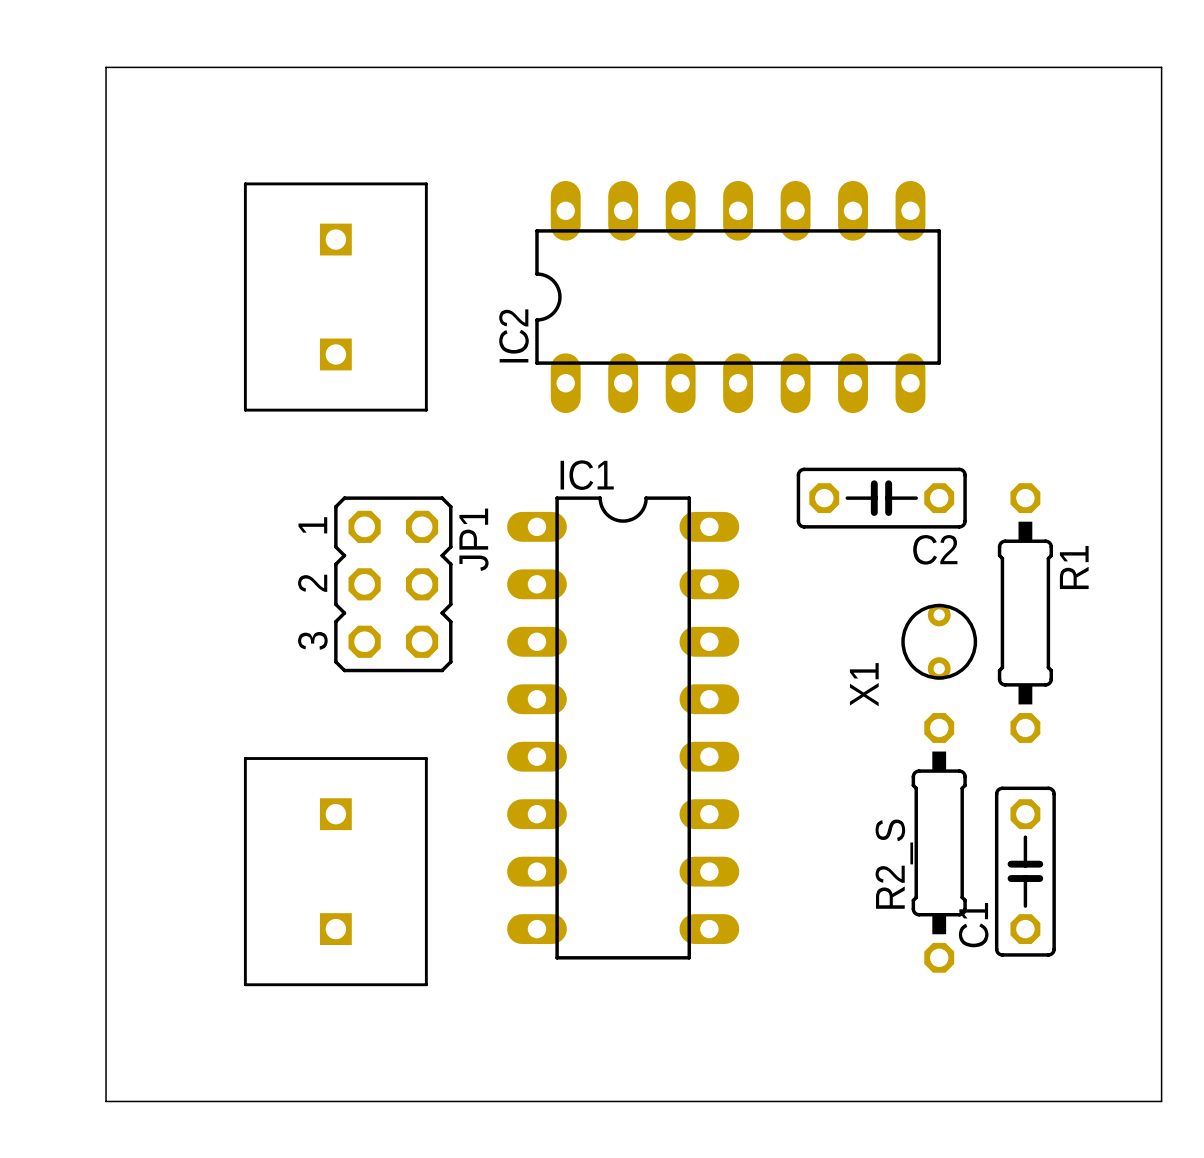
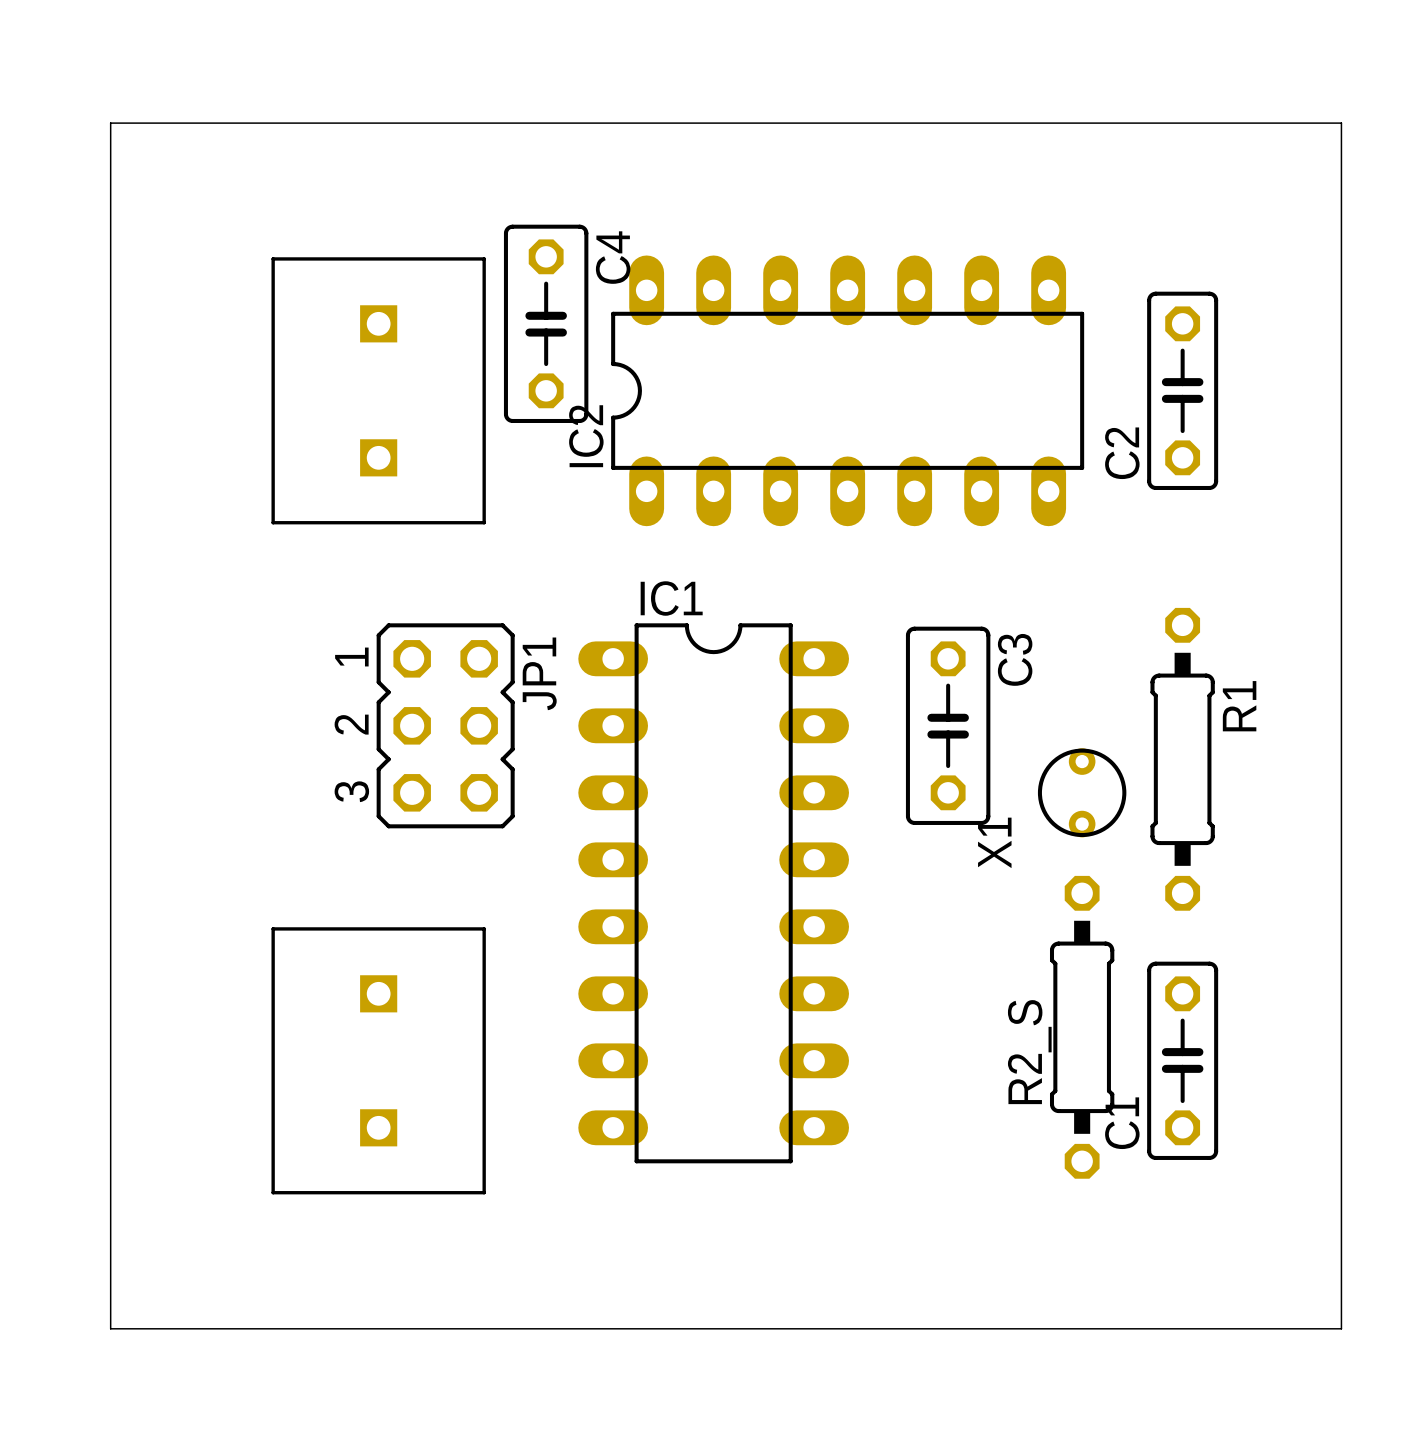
C4: none -> (546, 323)
C2 rotation: 0° (881, 498) -> 90° clockwise (1182, 390)
C2 position: (881, 498) -> (1182, 390)
C3: none -> (948, 725)

